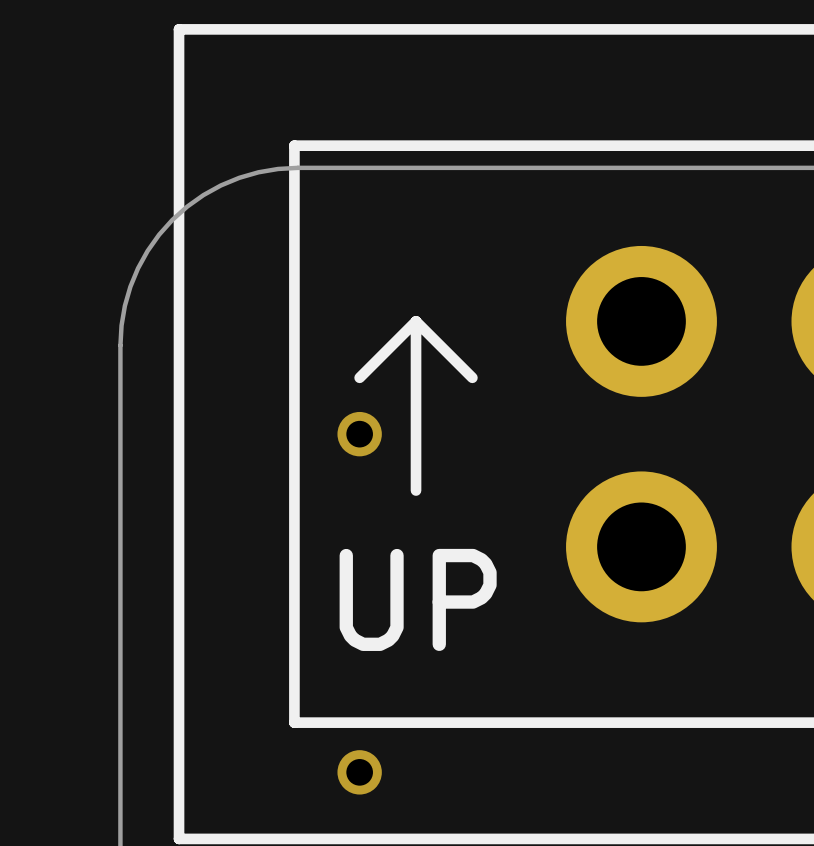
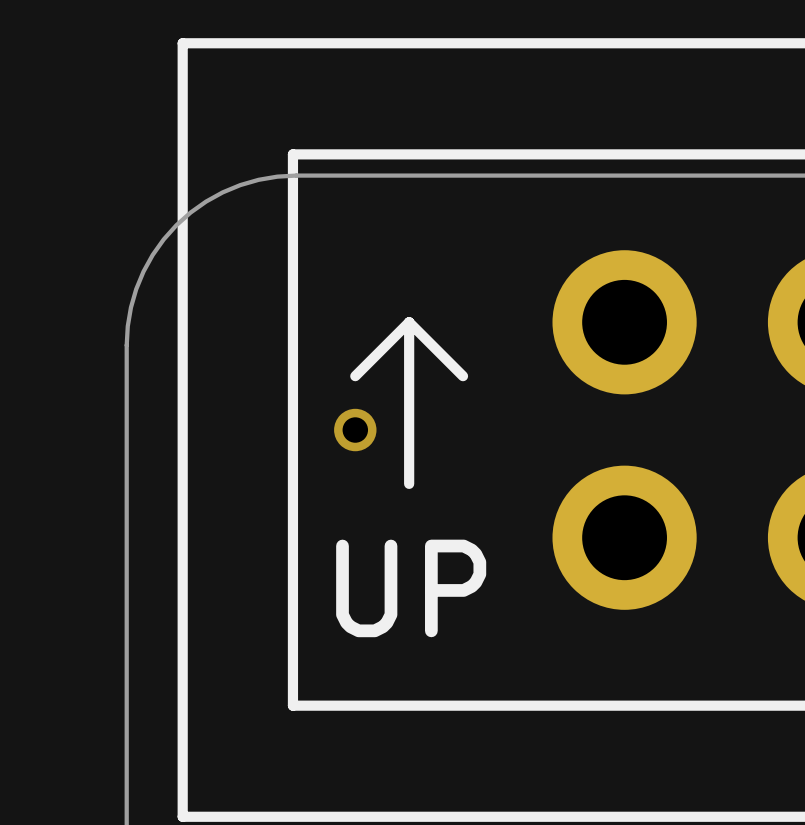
via: (359, 772) -> none

